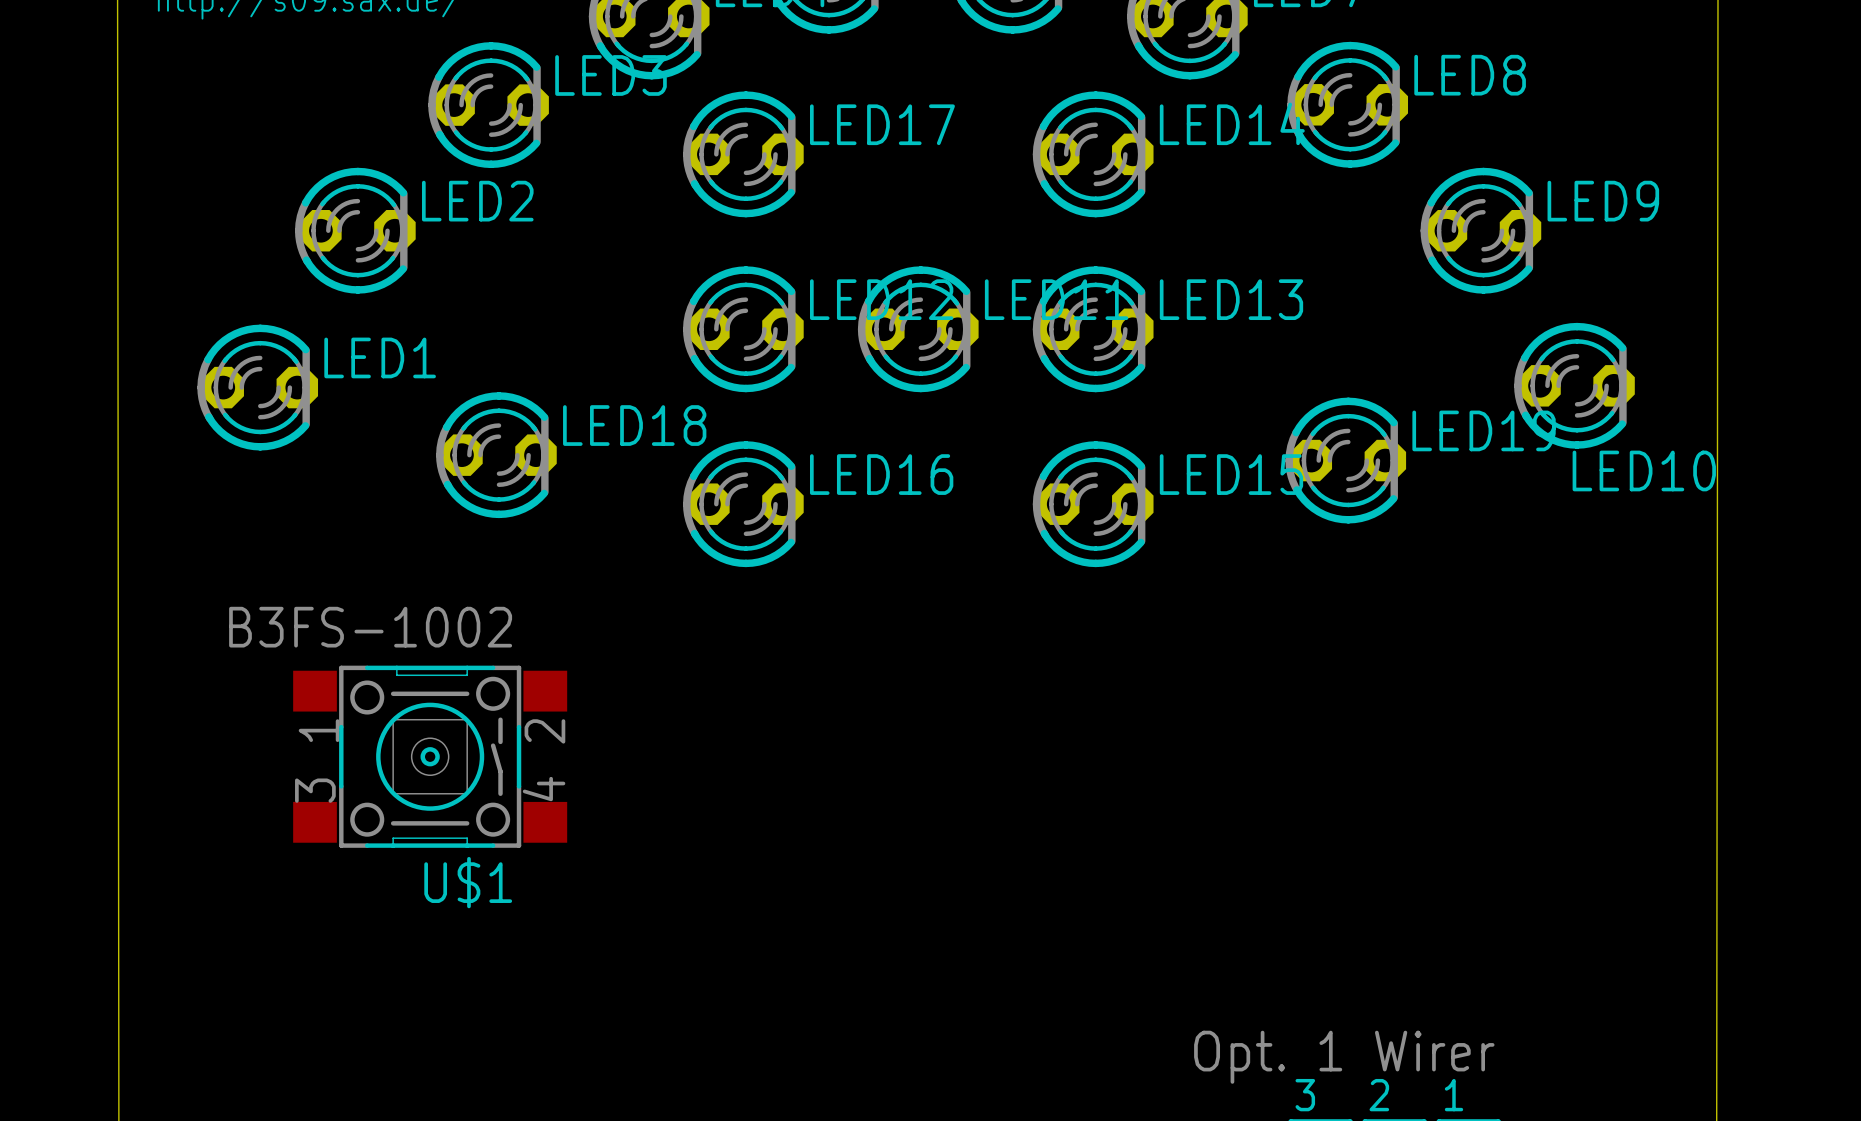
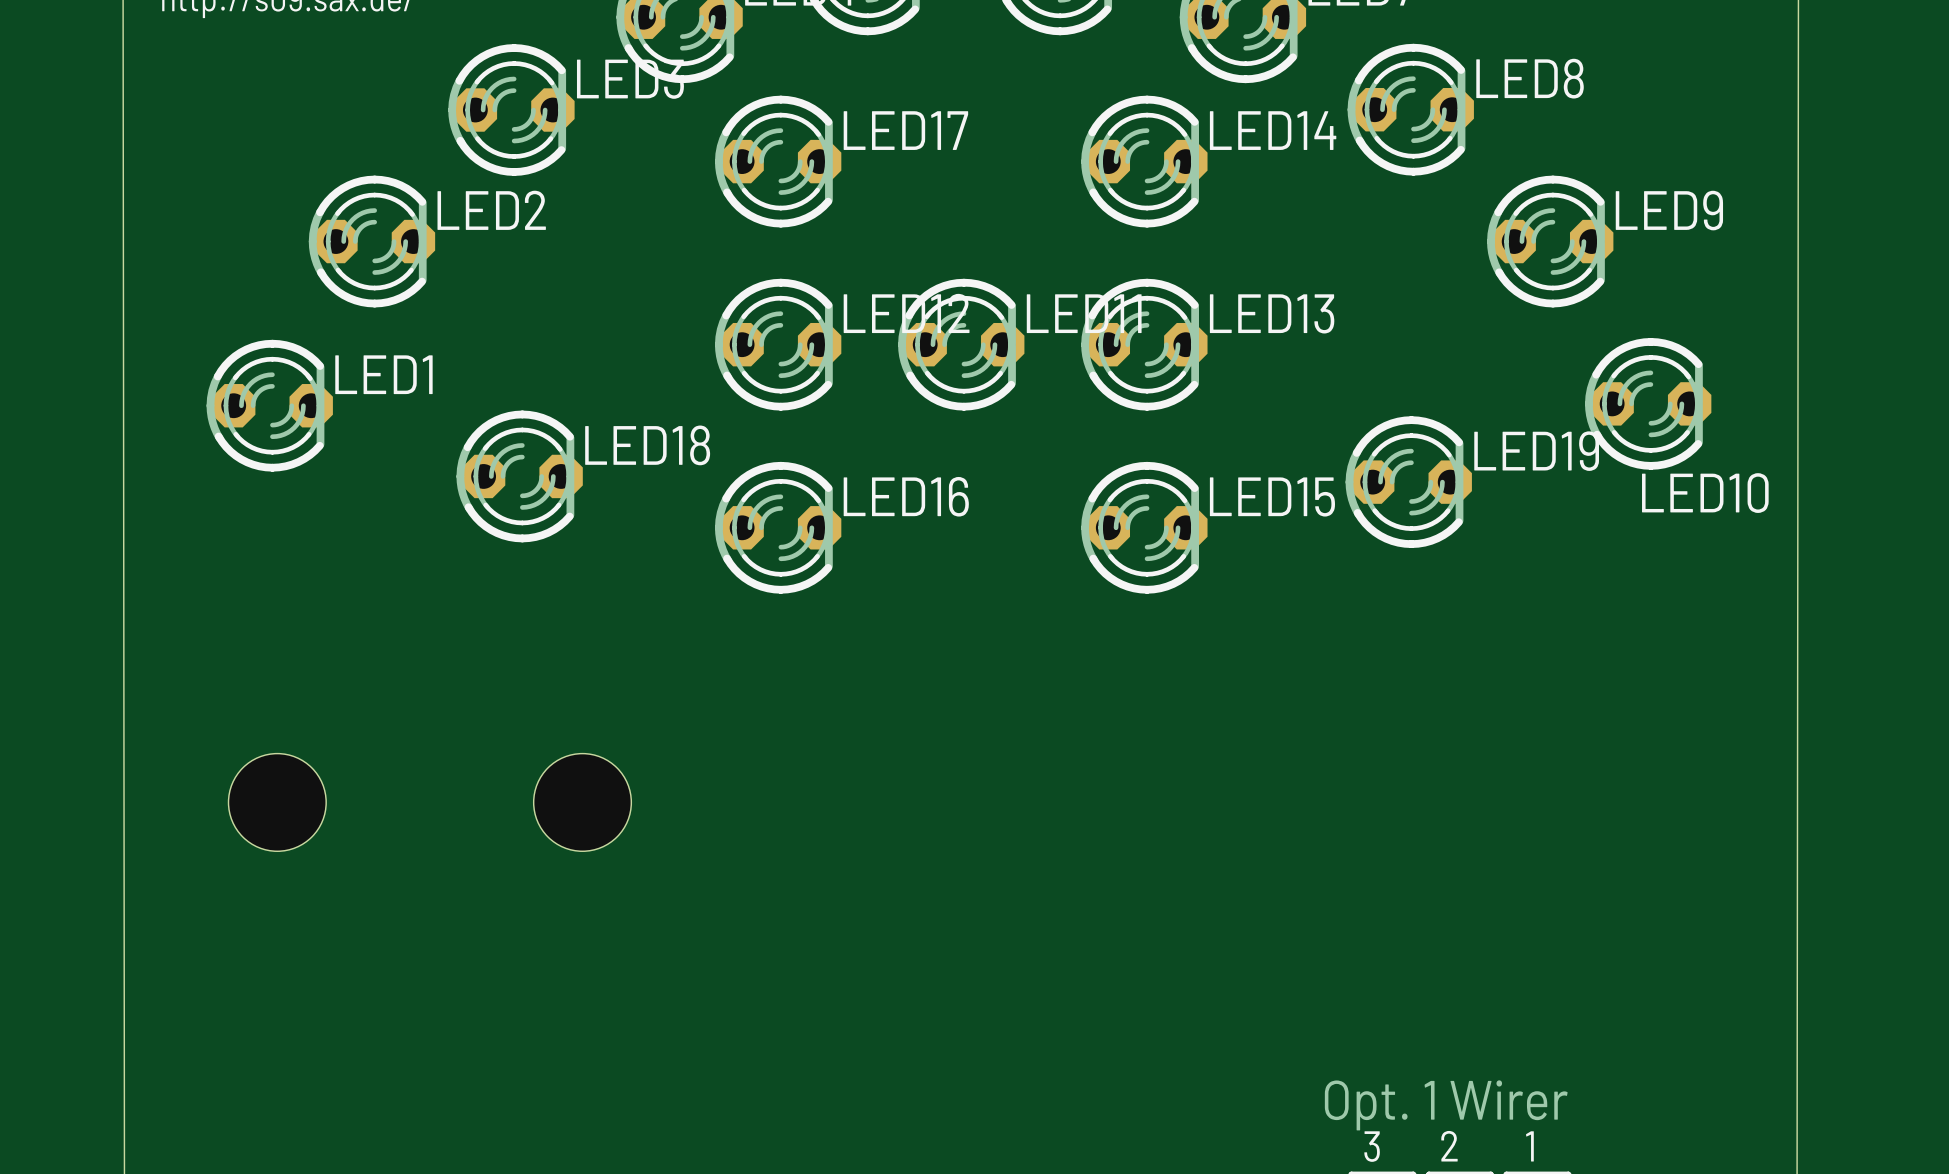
U$1: B3FS-1002 (430, 756) -> none
hole: none -> (277, 802)
hole: none -> (582, 802)

